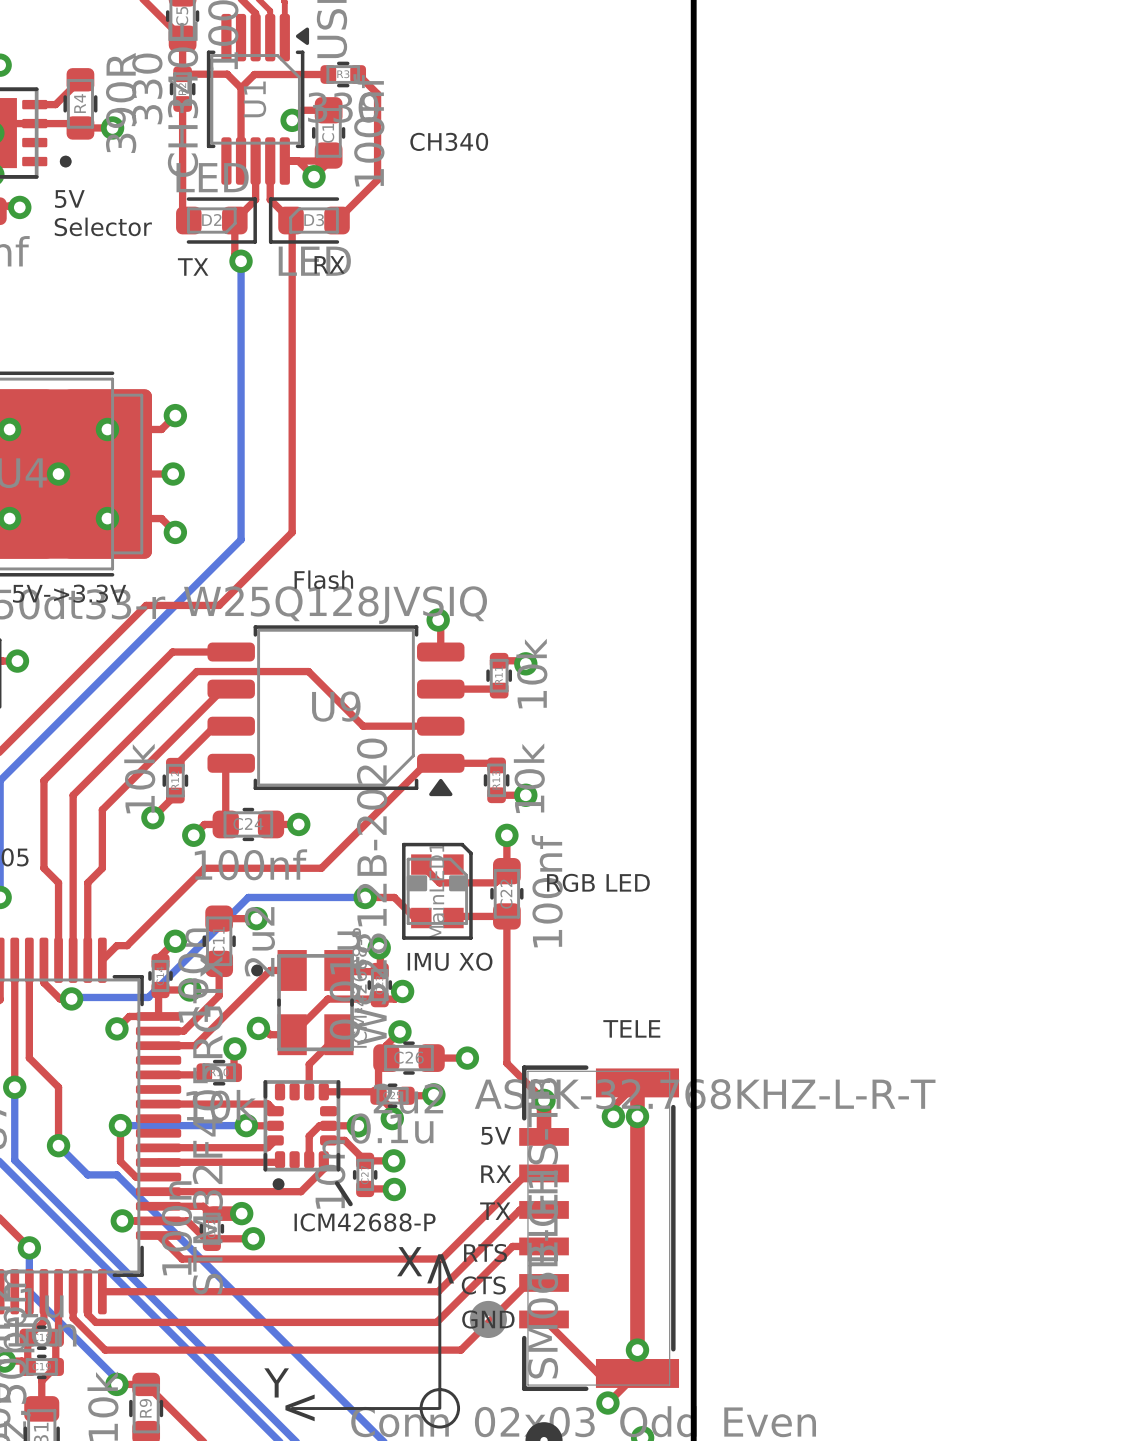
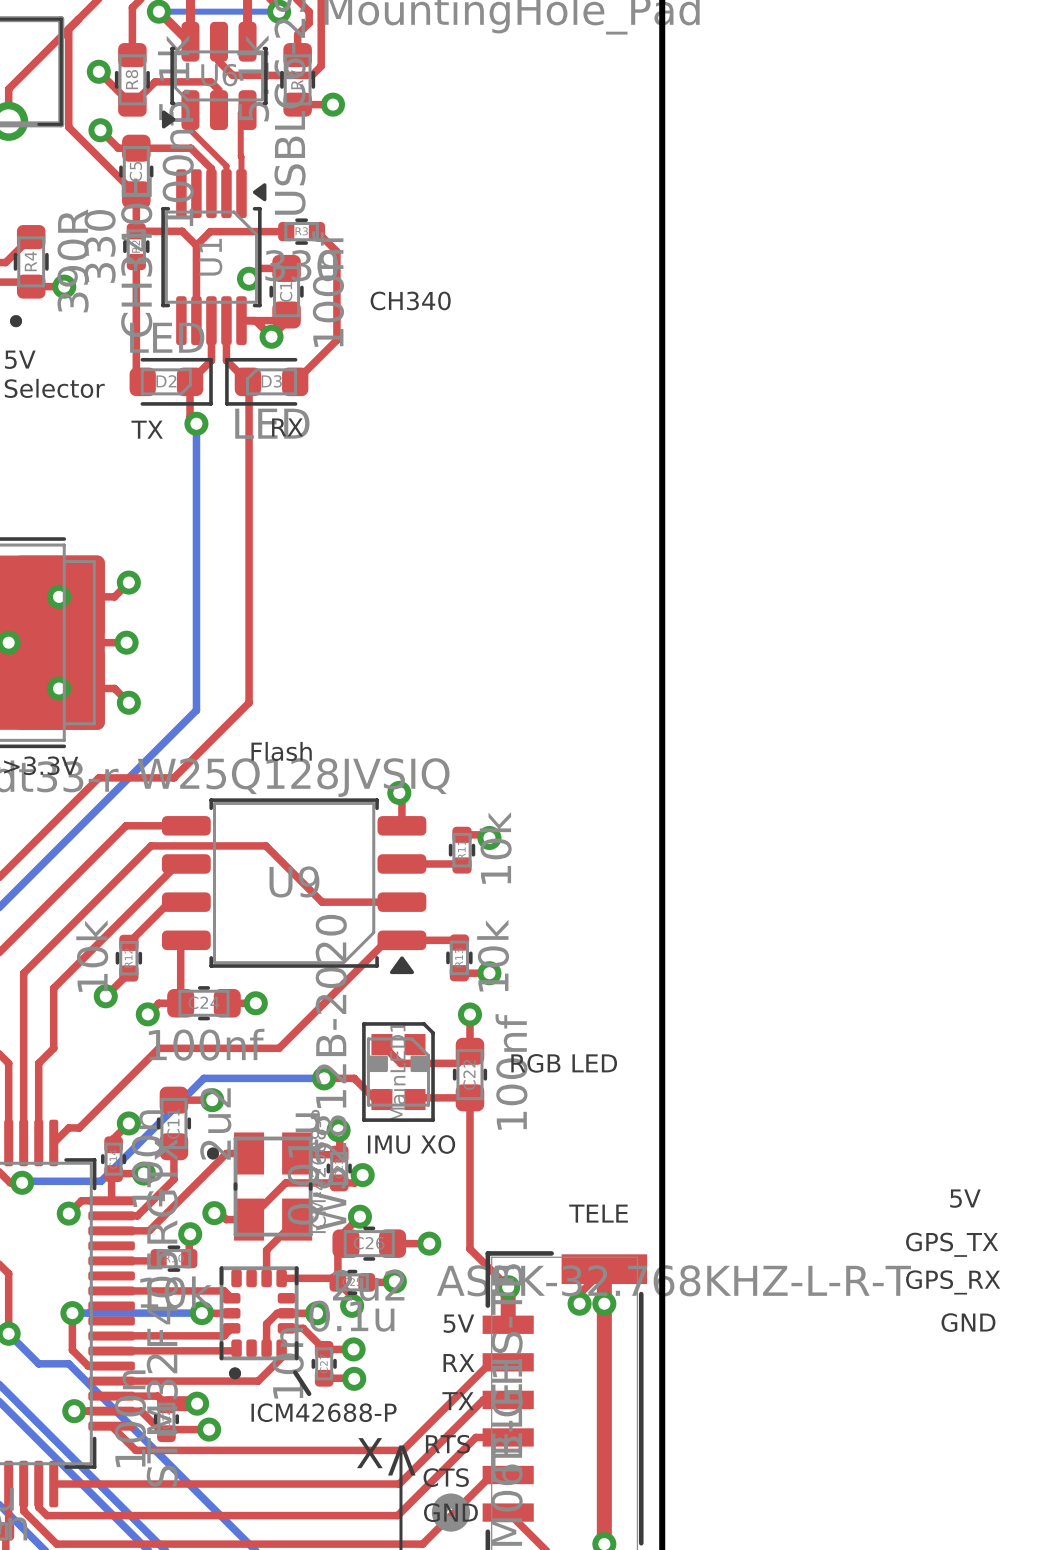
text: none -> 5V (965, 1198)
text: none -> GPS_TX (952, 1244)
text: none -> GPS_RX (953, 1282)
text: none -> GND (968, 1322)

